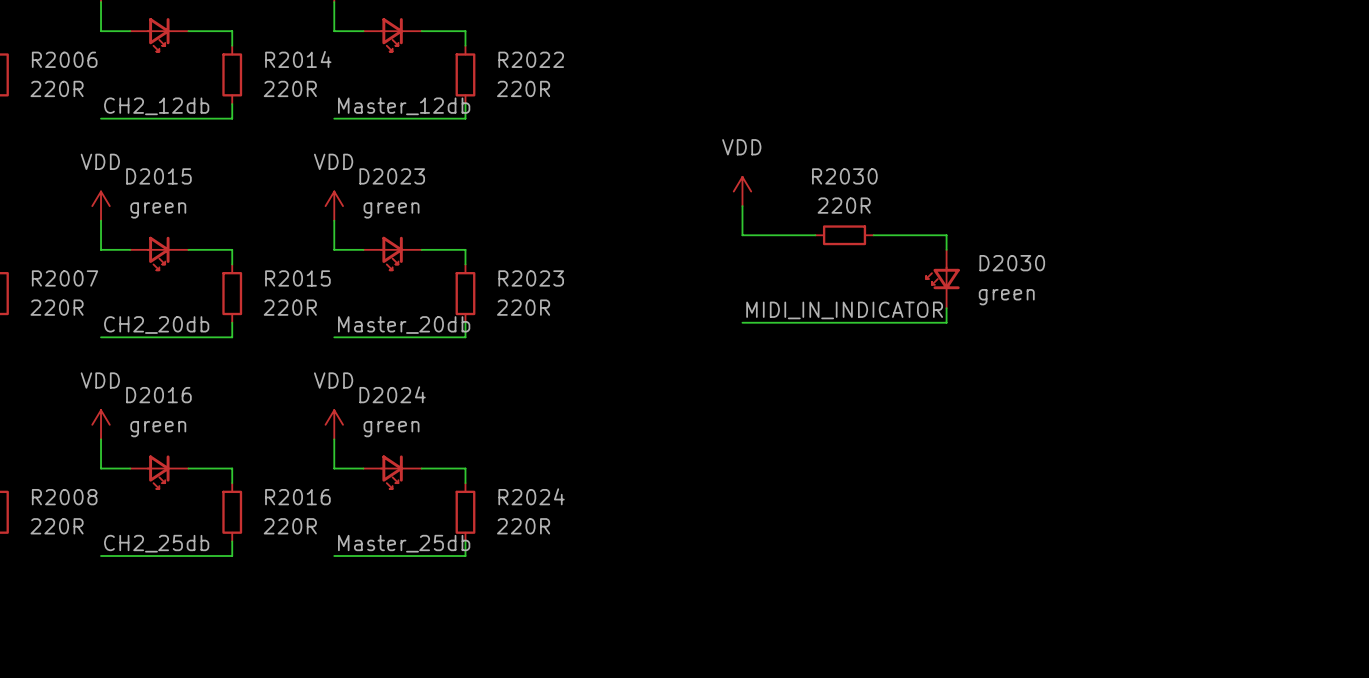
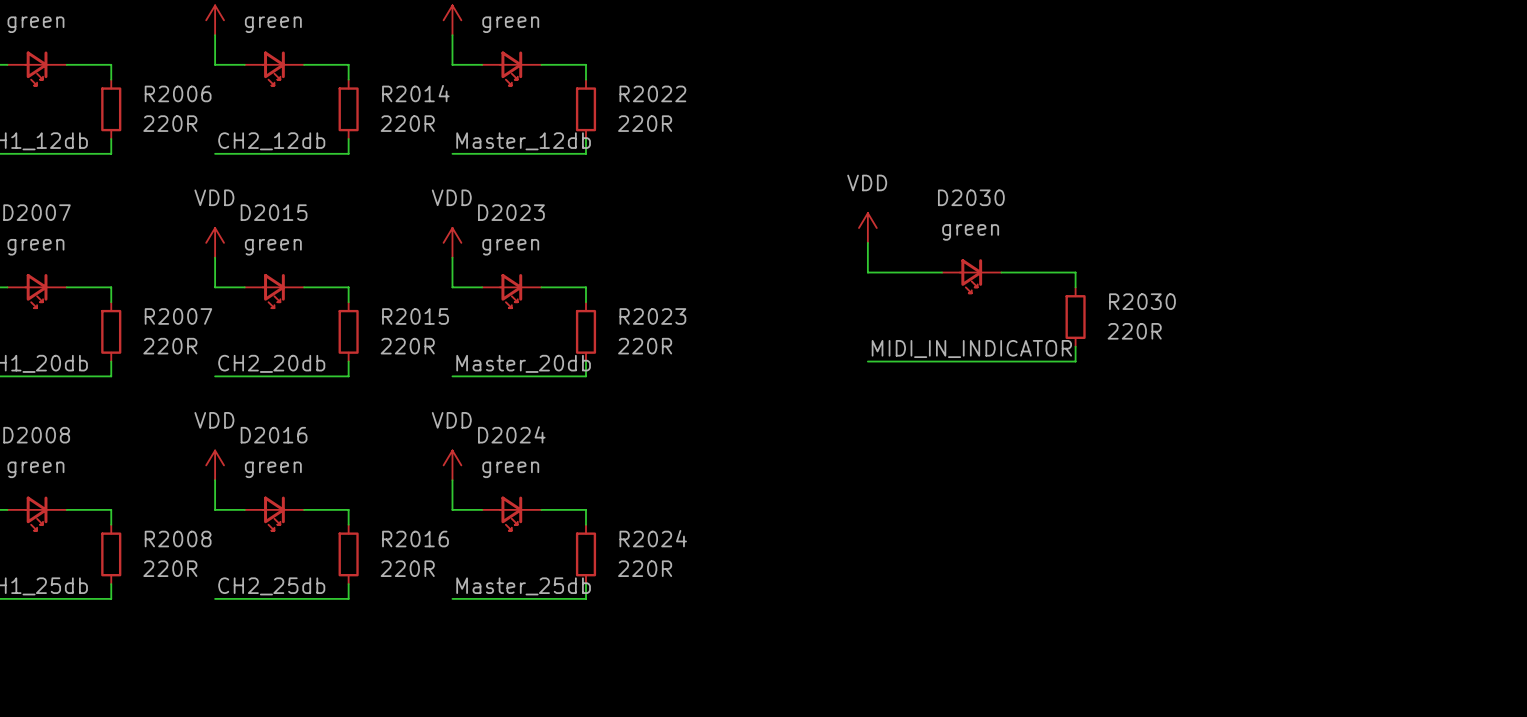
R2030 value position: 220R (844, 205) -> 220R (1134, 331)
R2030 rotation: 0° (844, 235) -> 90° clockwise (1075, 317)
R2030 position: (844, 235) -> (1075, 317)
D2030 rotation: 0° (942, 278) -> 90° counterclockwise (970, 276)
D2030 position: (942, 279) -> (971, 276)
D2030 value position: green (1006, 297) -> green (970, 232)

